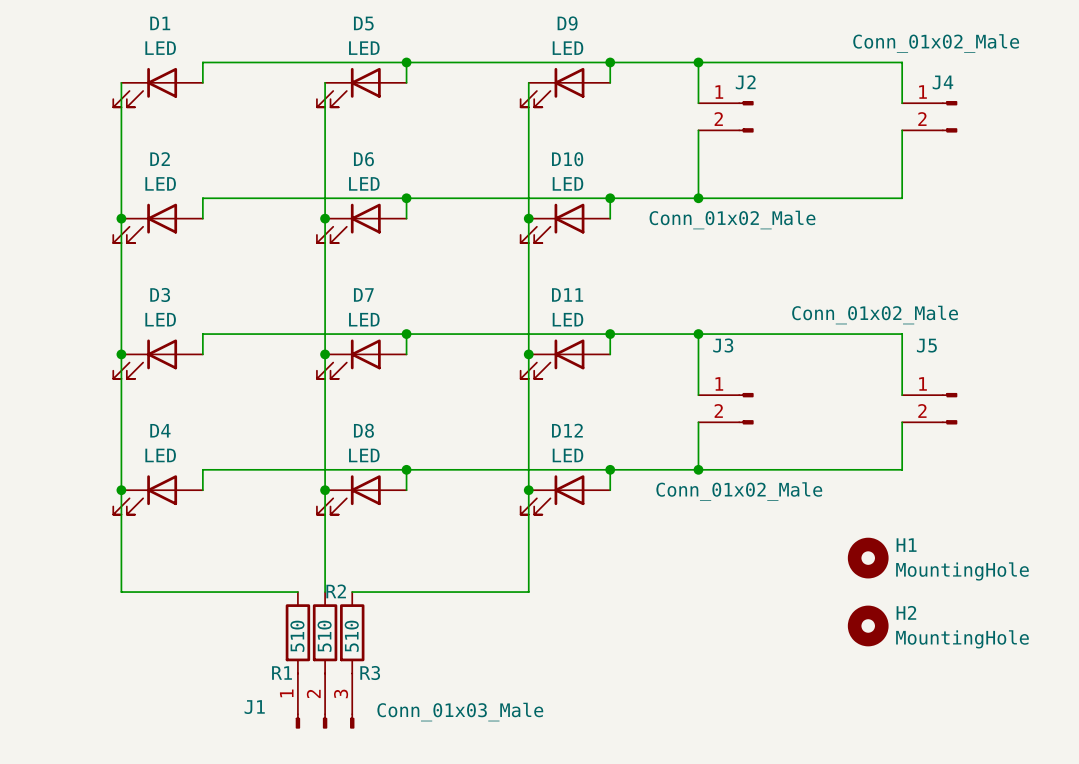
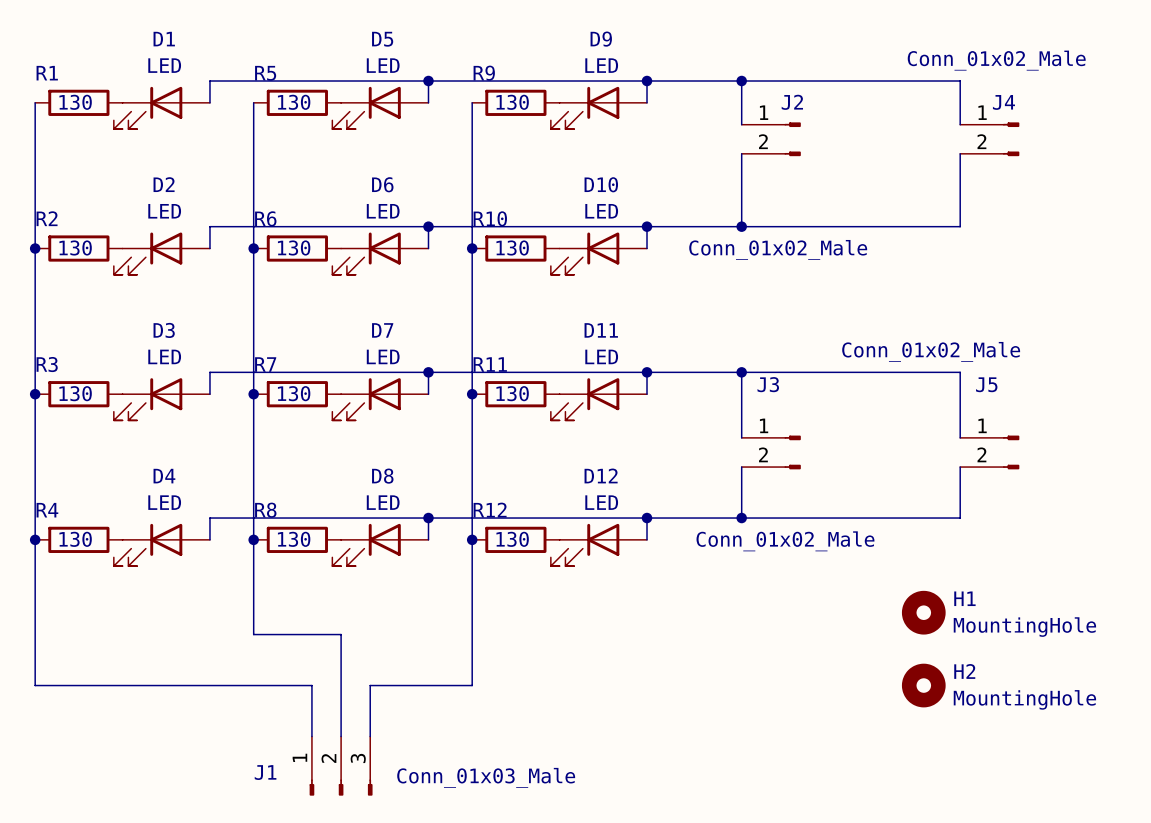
wire: none -> (35, 102) (35, 685) (311, 685) (311, 736)
wire: (121, 82) (121, 592) (297, 592) -> none
R5: none -> 130 (297, 102)
wire: (325, 82) (325, 578) -> (253, 102) (253, 634) (341, 634)
wire: none -> (472, 102) (472, 685) (370, 685) (370, 736)
R9: none -> 130 (515, 102)
wire: (528, 82) (528, 592) (352, 592) -> none
junction: none -> (35, 248)
junction: (121, 218) -> none
junction: none -> (253, 248)
R6: none -> 130 (297, 248)
junction: (325, 218) -> none
junction: none -> (472, 248)
R10: none -> 130 (515, 248)
junction: (528, 218) -> none
junction: none -> (35, 394)
junction: (121, 354) -> none
junction: none -> (253, 394)
R7: none -> 130 (297, 394)
junction: (325, 354) -> none
junction: none -> (472, 394)
R11: none -> 130 (515, 394)
junction: (528, 354) -> none
junction: none -> (35, 539)
R4: none -> 130 (78, 539)
junction: (121, 490) -> none
junction: none -> (253, 539)
R8: none -> 130 (297, 539)
junction: (325, 490) -> none
junction: none -> (472, 539)
R12: none -> 130 (515, 539)
junction: (528, 490) -> none
R2 name position: R2 (336, 591) -> R2 (47, 218)
wire: none -> (341, 649) (341, 736)
R1 rotation: 0° (297, 632) -> 90° clockwise (78, 102)
R1 position: (297, 632) -> (78, 102)
R2 rotation: 0° (325, 632) -> 90° clockwise (78, 248)
R2 position: (325, 632) -> (78, 248)
R3 rotation: 0° (352, 632) -> 90° clockwise (78, 394)
R3 position: (352, 632) -> (78, 394)
R1 value: 510 (297, 636) -> 130 (75, 102)
R2 value: 510 (324, 636) -> 130 (75, 247)
R3 value: 510 (351, 636) -> 130 (75, 393)
R1 name position: R1 (282, 672) -> R1 (47, 73)
R3 name position: R3 (370, 673) -> R3 (47, 364)

